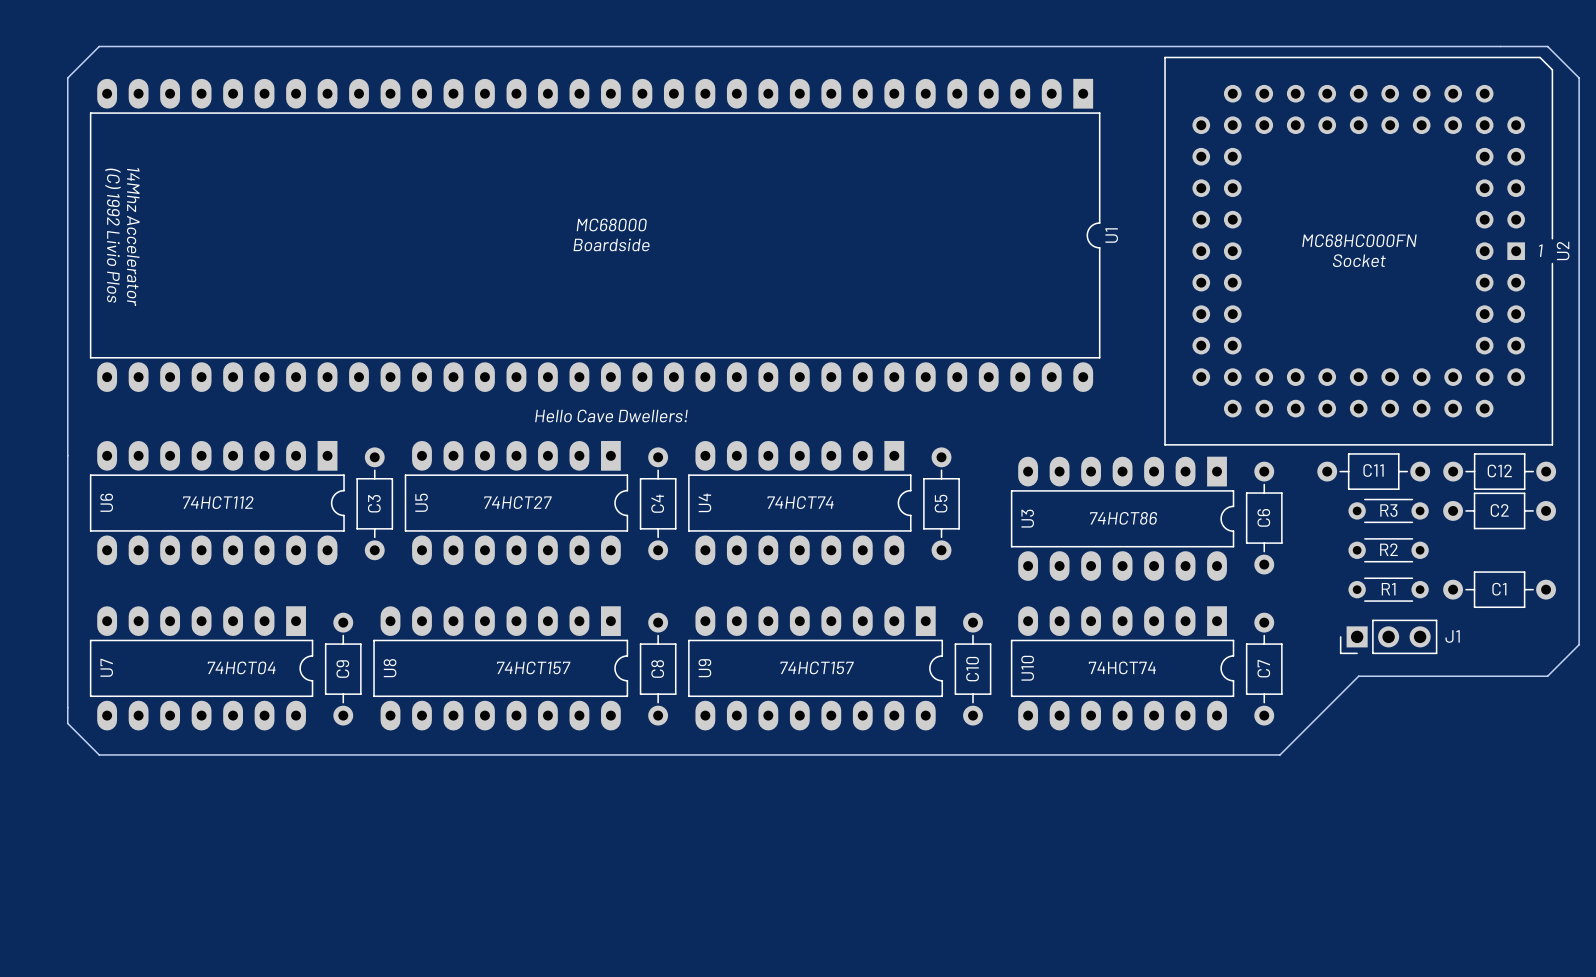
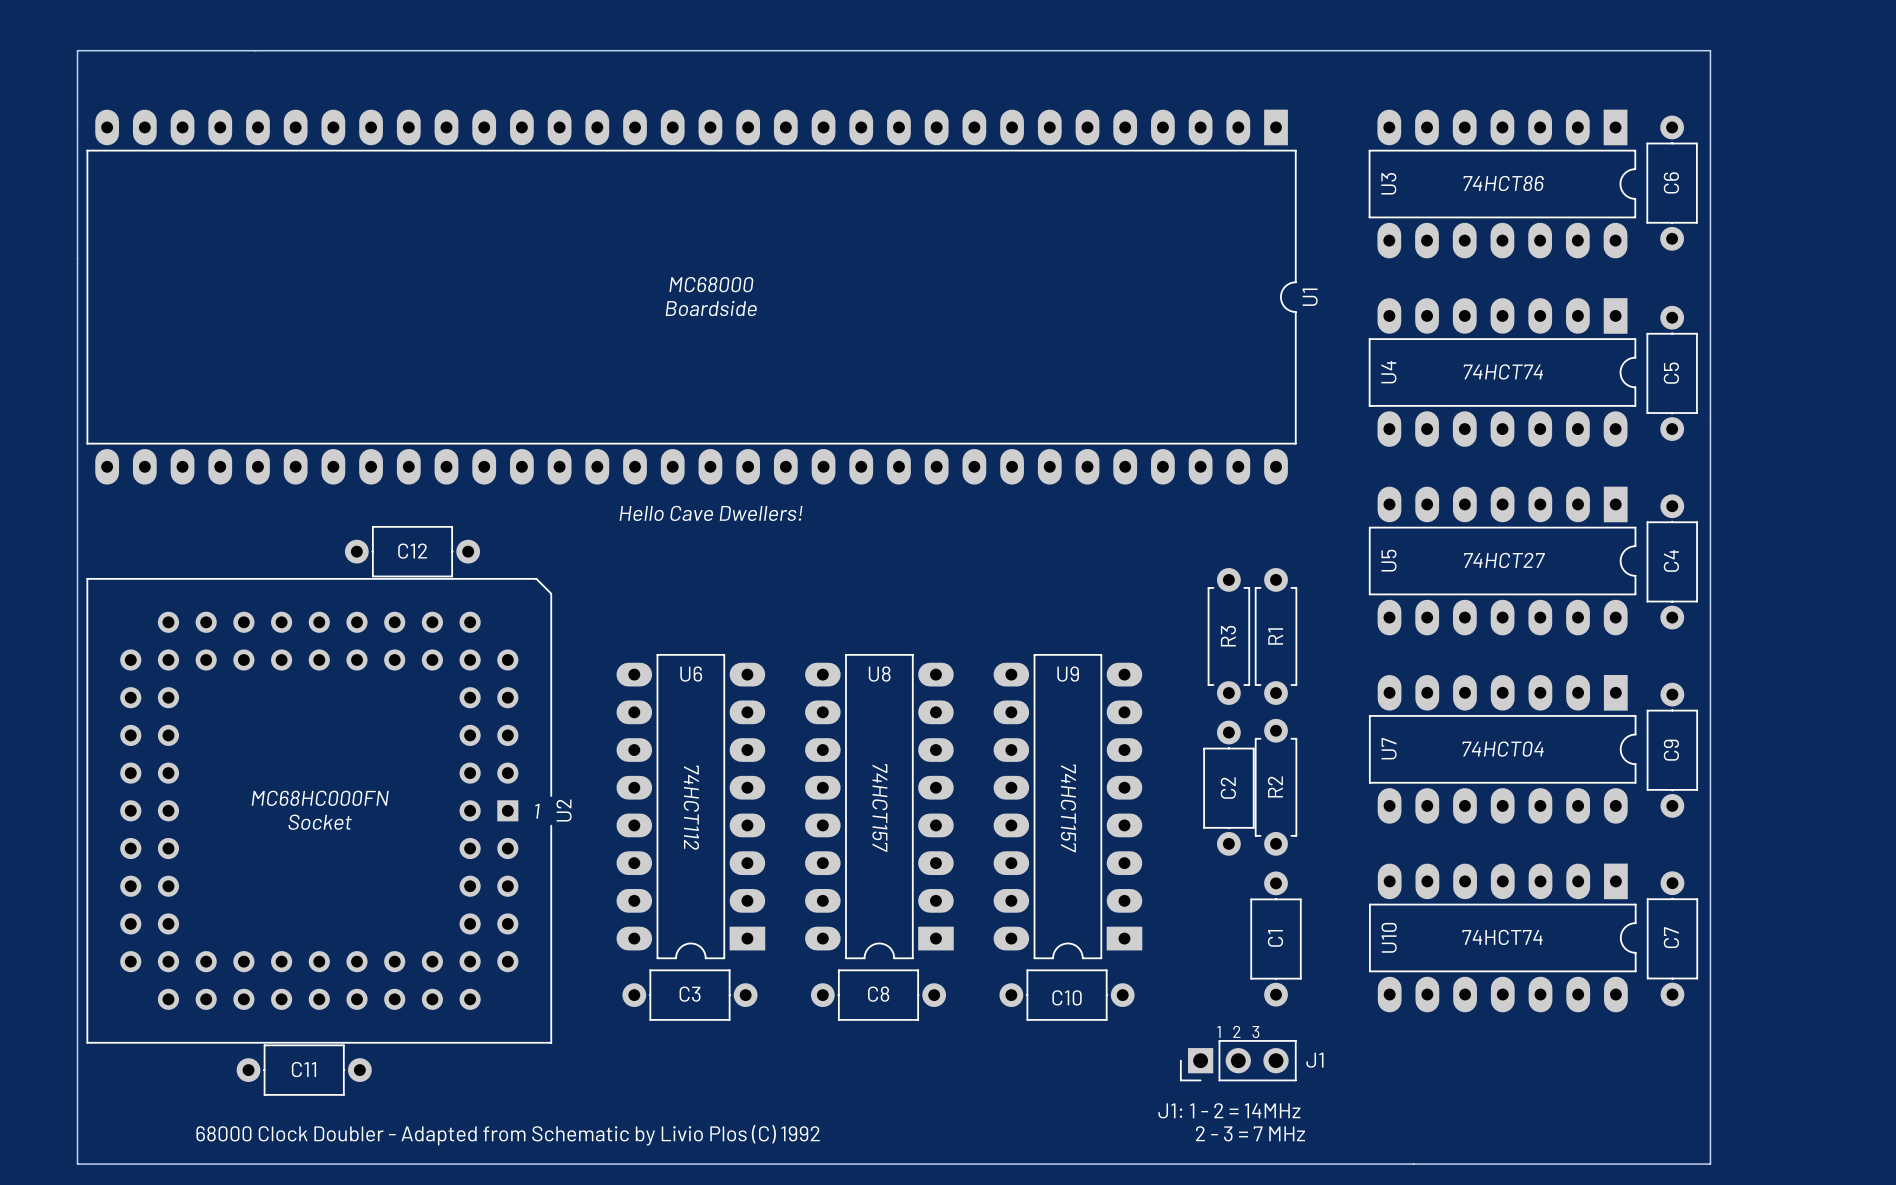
board edge: (99, 46) (67, 77) (67, 723) (99, 754) (1280, 754) (1358, 676) (1547, 676) (1579, 644) (1579, 77) (1547, 46) (99, 46) -> (77, 50) (77, 1164) (1710, 1164) (1710, 50) (77, 50)
text: none -> 74HCT86 (1503, 183)
text: (C) 1992 Livio Plos (112, 235) -> none
text: 14Mhz Accelerator (133, 237) -> none
text: MC68HC000FN (1359, 240) -> none
text: 1 (1540, 250) -> none
U2 position: (1358, 251) -> (319, 810)
text: Socket (1359, 260) -> none
text: none -> 74HCT74 (1503, 371)
C3 footprint: [356, 447, 394, 561] -> [622, 969, 758, 1021]
C4 footprint: [639, 447, 677, 561] -> [1646, 494, 1698, 630]
C5 footprint: [923, 447, 960, 561] -> [1646, 305, 1698, 441]
C11 footprint: [1317, 453, 1431, 490] -> [236, 1044, 372, 1096]
C12 footprint: [1443, 453, 1557, 490] -> [344, 525, 481, 578]
text: none -> 74HCT27 (1504, 560)
C6 footprint: [1245, 461, 1283, 575] -> [1646, 115, 1698, 251]
C2 footprint: [1443, 492, 1556, 530] -> [1203, 720, 1255, 856]
R3 footprint: [1348, 498, 1429, 524] -> [1207, 568, 1251, 705]
text: 74HCT112 (218, 502) -> none
text: 74HCT27 (517, 502) -> none
text: 74HCT74 (800, 502) -> none
U6 rotation: 0° (217, 503) -> 90° clockwise (690, 806)
U6 position: (217, 503) -> (690, 806)
U5 position: (516, 503) -> (1502, 561)
U4 position: (799, 503) -> (1502, 372)
U3 position: (1122, 518) -> (1502, 184)
text: 74HCT86 (1123, 518) -> none
R2 footprint: [1348, 538, 1429, 563] -> [1254, 718, 1298, 856]
C1 footprint: [1443, 571, 1556, 609] -> [1250, 871, 1302, 1007]
R1 footprint: [1348, 577, 1429, 602] -> [1254, 568, 1298, 705]
C9 footprint: [324, 612, 362, 726] -> [1646, 682, 1699, 818]
C8 footprint: [639, 612, 677, 726] -> [810, 969, 947, 1021]
C10 footprint: [954, 612, 992, 726] -> [999, 969, 1135, 1021]
C7 footprint: [1245, 612, 1283, 726] -> [1646, 871, 1699, 1007]
text: none -> 74HCT04 (1503, 749)
J1 position: (1388, 636) -> (1238, 1060)
text: none -> MC68HC000FN (320, 798)
text: none -> 74HCT157 (1068, 808)
text: none -> 1 (537, 811)
text: 74HCT04 (241, 667) -> none
text: 74HCT157 (533, 667) -> 74HCT112 (691, 807)
text rotation: 0° (817, 667) -> 90° clockwise (879, 808)
text position: 74HCT74 (1122, 667) -> 74HCT74 (1502, 937)
U7 position: (201, 668) -> (1502, 749)
U8 rotation: 0° (500, 668) -> 90° clockwise (879, 806)
U8 position: (500, 668) -> (879, 806)
U9 rotation: 0° (815, 668) -> 90° clockwise (1067, 806)
U10 position: (1122, 668) -> (1502, 937)
text: none -> Socket (320, 822)
text: none -> 1 2 3 (1238, 1031)
text: none -> J1: 1 - 2 = 14MHz (1229, 1110)
text: none -> 2 - 3 = 7 MHz (1250, 1133)
text: none -> 68000 Clock Doubler - Adapted from Schematic by Livio Plos (C) 1992 (508, 1135)

